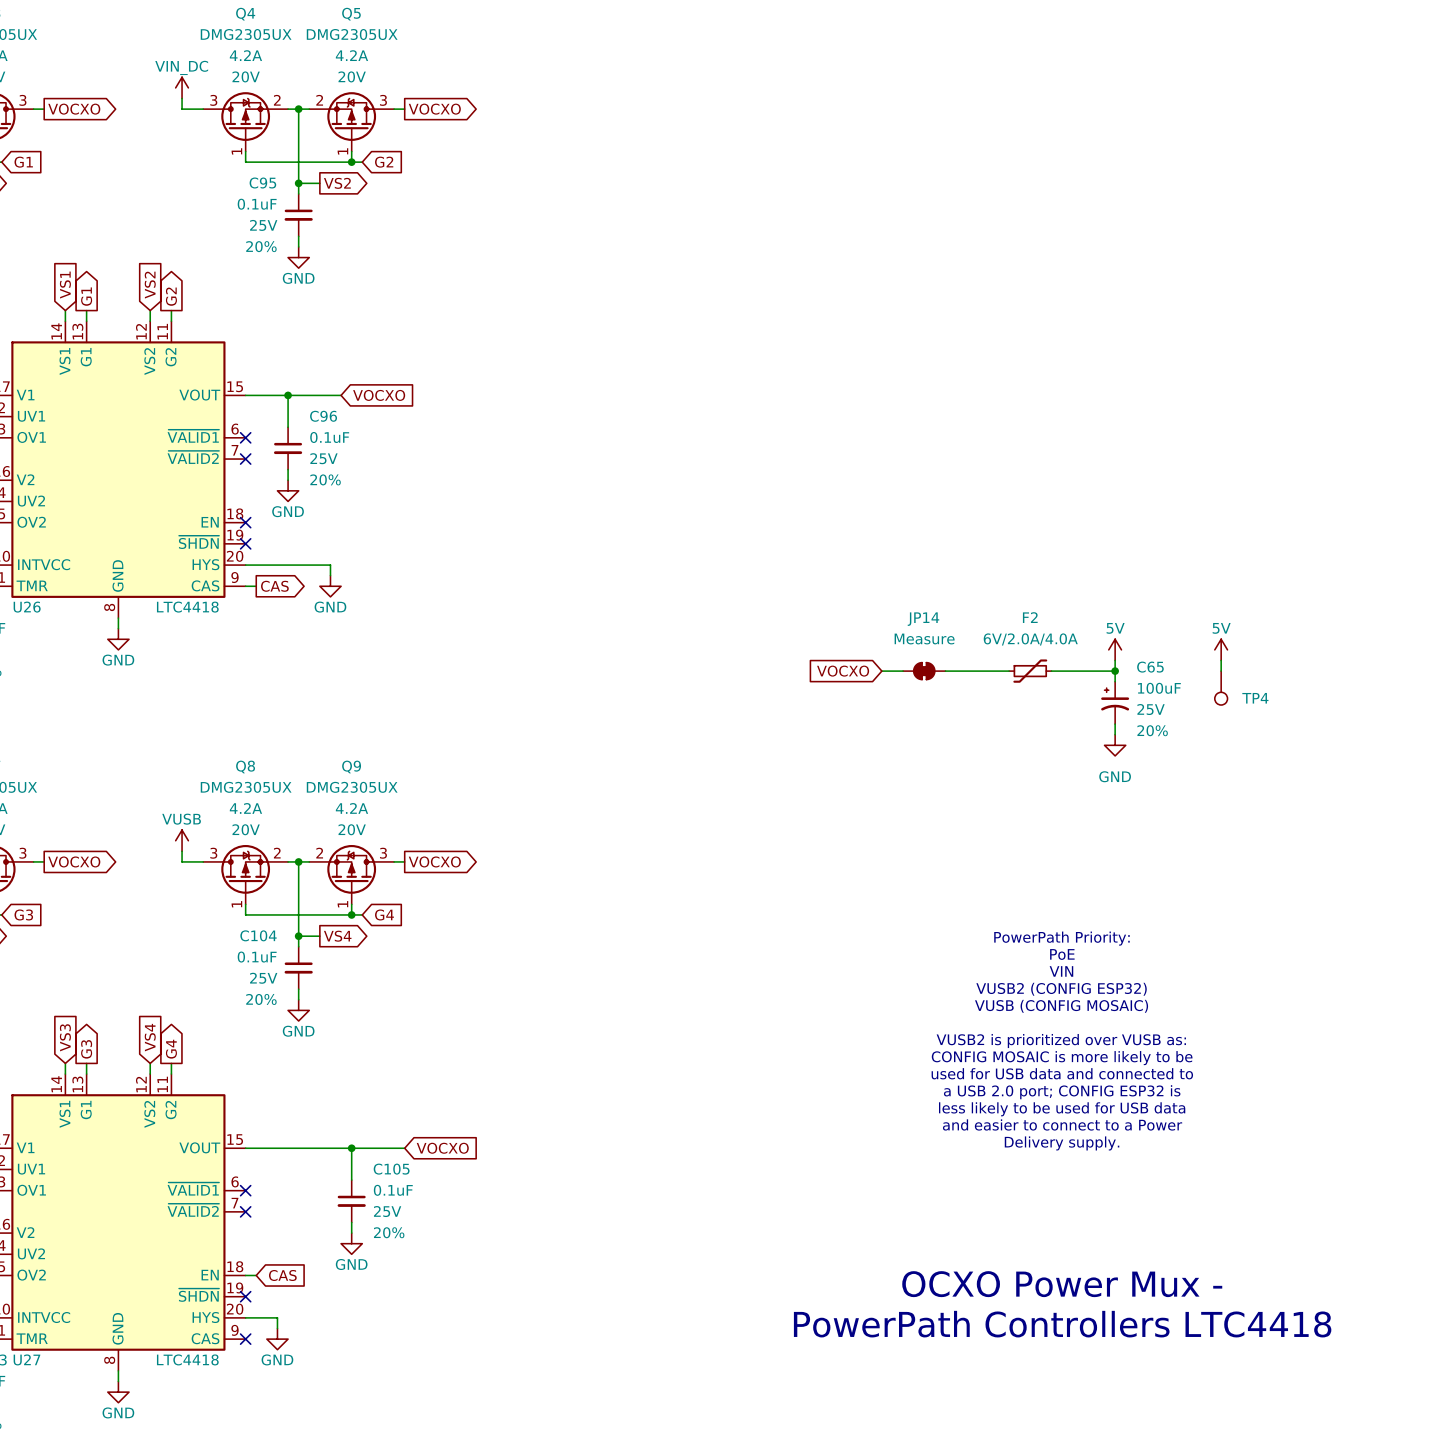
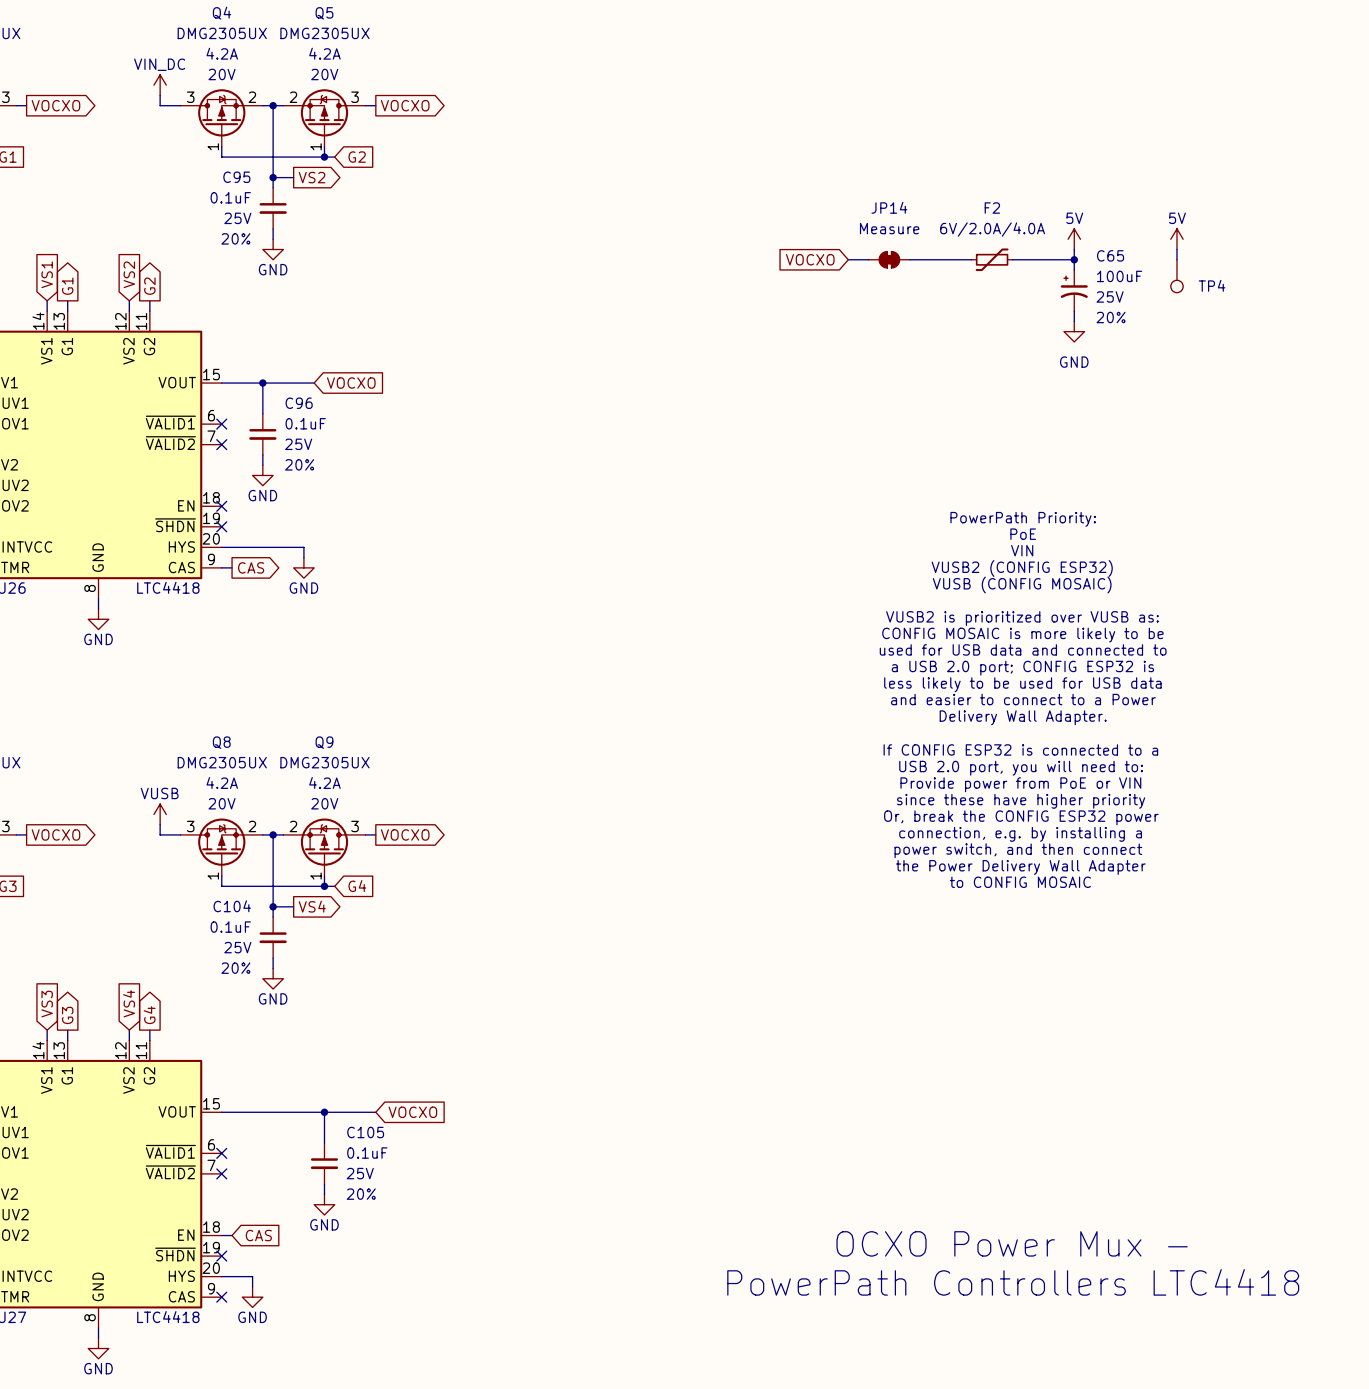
power symbol: none -> 5V (1074, 239)
power symbol: none -> 5V (1176, 239)
wire: none -> (1074, 249) (1074, 270)
wire: none -> (1176, 249) (1176, 259)
global label: none -> VOCXO (810, 259)
wire: none -> (848, 259) (868, 259)
wire: none -> (909, 259) (971, 259)
wire: none -> (1012, 259) (1074, 259)
junction: none -> (1074, 259)
wire: none -> (1074, 311) (1074, 321)
power symbol: none -> GND (1074, 331)
text: none -> PowerPath Priority: (1023, 519)
text: none -> PoE (1023, 534)
text: none -> VIN (1022, 550)
text: none -> VUSB2 (CONFIG ESP32) (1022, 568)
text: none -> VUSB (CONFIG MOSAIC) (1022, 585)
text: none -> VUSB2 is prioritized over VUSB as: (1022, 618)
power symbol: 5V (1115, 649) -> none
power symbol: 5V (1221, 649) -> none
text: none -> CONFIG MOSAIC is more likely to be (1022, 635)
wire: (1115, 660) (1115, 681) -> none
wire: (1221, 660) (1221, 671) -> none
text: none -> used for USB data and connected to (1023, 649)
global label: VOCXO (843, 671) -> none
wire: (881, 671) (903, 671) -> none
JP14 position: (924, 671) -> (889, 259)
wire: (945, 671) (1009, 671) -> none
F2 position: (1030, 671) -> (992, 259)
wire: (1051, 671) (1115, 671) -> none
junction: (1115, 671) -> none
TP4 position: (1221, 688) -> (1176, 276)
text: none -> a USB 2.0 port; CONFIG ESP32 is (1022, 668)
C65 position: (1115, 702) -> (1074, 290)
text: none -> less likely to be used for USB data (1022, 684)
text: none -> and easier to connect to a Power (1023, 699)
wire: (1115, 724) (1115, 734) -> none
text: none -> Delivery Wall Adapter. (1023, 717)
power symbol: GND (1115, 745) -> none
text: none -> If CONFIG ESP32 is connected to a (1020, 749)
text: none -> USB 2.0 port, you will need to: (1021, 768)
text: none -> Provide power from PoE or VIN (1020, 784)
text: none -> since these have higher priority (1021, 801)
text: none -> Or, break the CONFIG ESP32 power (1021, 817)
text: none -> connection, e.g. by installing a (1020, 834)
text: none -> power switch (942, 850)
text: none -> , and then connect (1068, 849)
text: none -> the Power Delivery Wall Adapter (1020, 867)
text: none -> to CONFIG MOSAIC (1020, 882)
text: PowerPath Priority: (1061, 938) -> none
text: PoE (1062, 954) -> none
text: VIN (1061, 971) -> none
text: VUSB2 (CONFIG ESP32) (1061, 989) -> none
text: VUSB (CONFIG MOSAIC) (1061, 1006) -> none
text: VUSB2 is prioritized over VUSB as: (1061, 1041) -> none
text: CONFIG MOSAIC is more likely to be (1062, 1058) -> none
text: used for USB data and connected to (1062, 1073) -> none
text: a USB 2.0 port; CONFIG ESP32 is (1062, 1092) -> none
text: less likely to be used for USB data (1062, 1109) -> none
text: and easier to connect to a Power (1062, 1124) -> none
text: Delivery supply. (1062, 1143) -> none

